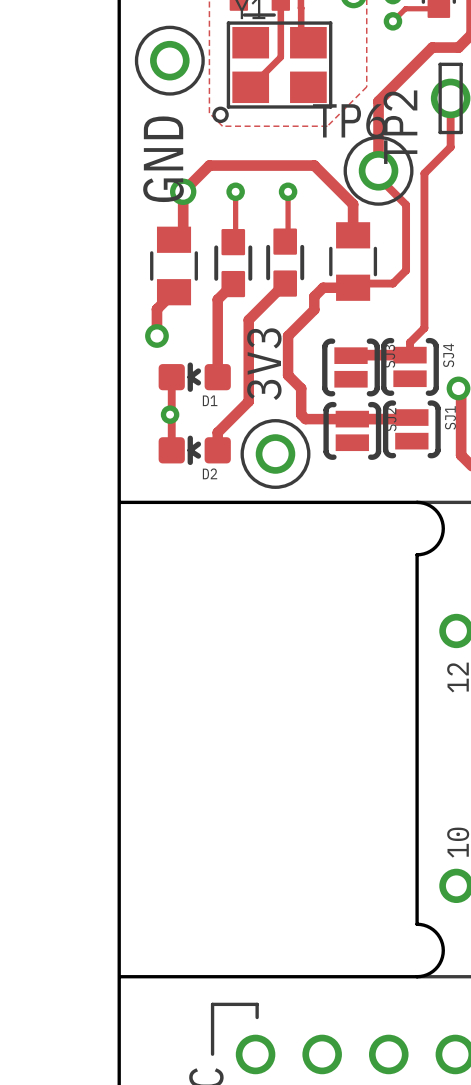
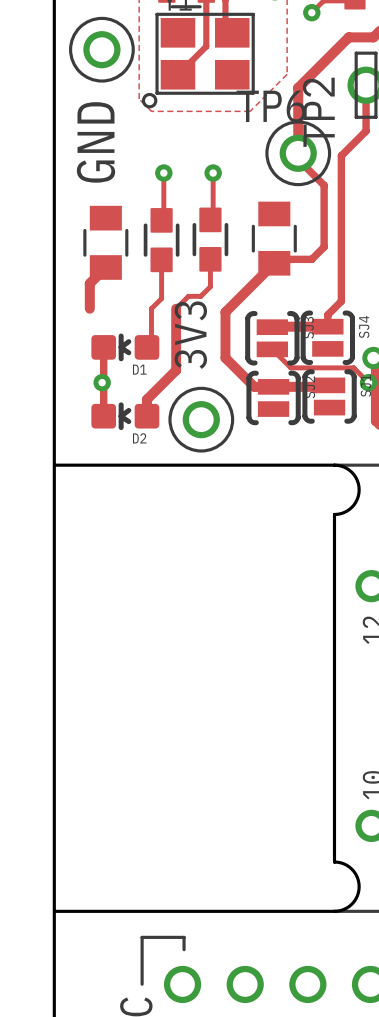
via: (183, 191) -> none
track: (353, 235) (353, 204) (314, 165) (209, 165) (183, 191) (183, 230) (174, 239) -> none
track: (285, 283) (248, 320) (248, 336) -> (210, 259) (210, 286) (200, 296) (188, 296) (176, 308)
track: (233, 284) (217, 299) (217, 377) -> (161, 259) (161, 298) (151, 308) (151, 342) (146, 347)
track: (353, 287) (323, 287) (314, 296) (314, 309) (288, 336) (288, 375) (301, 388) (301, 414) (305, 419) (331, 419) -> (274, 263) (225, 312) (225, 358) (254, 386)
via: (156, 336) -> none
track: none -> (272, 349) (290, 367) (353, 367) (368, 382)
via: none -> (368, 382)

